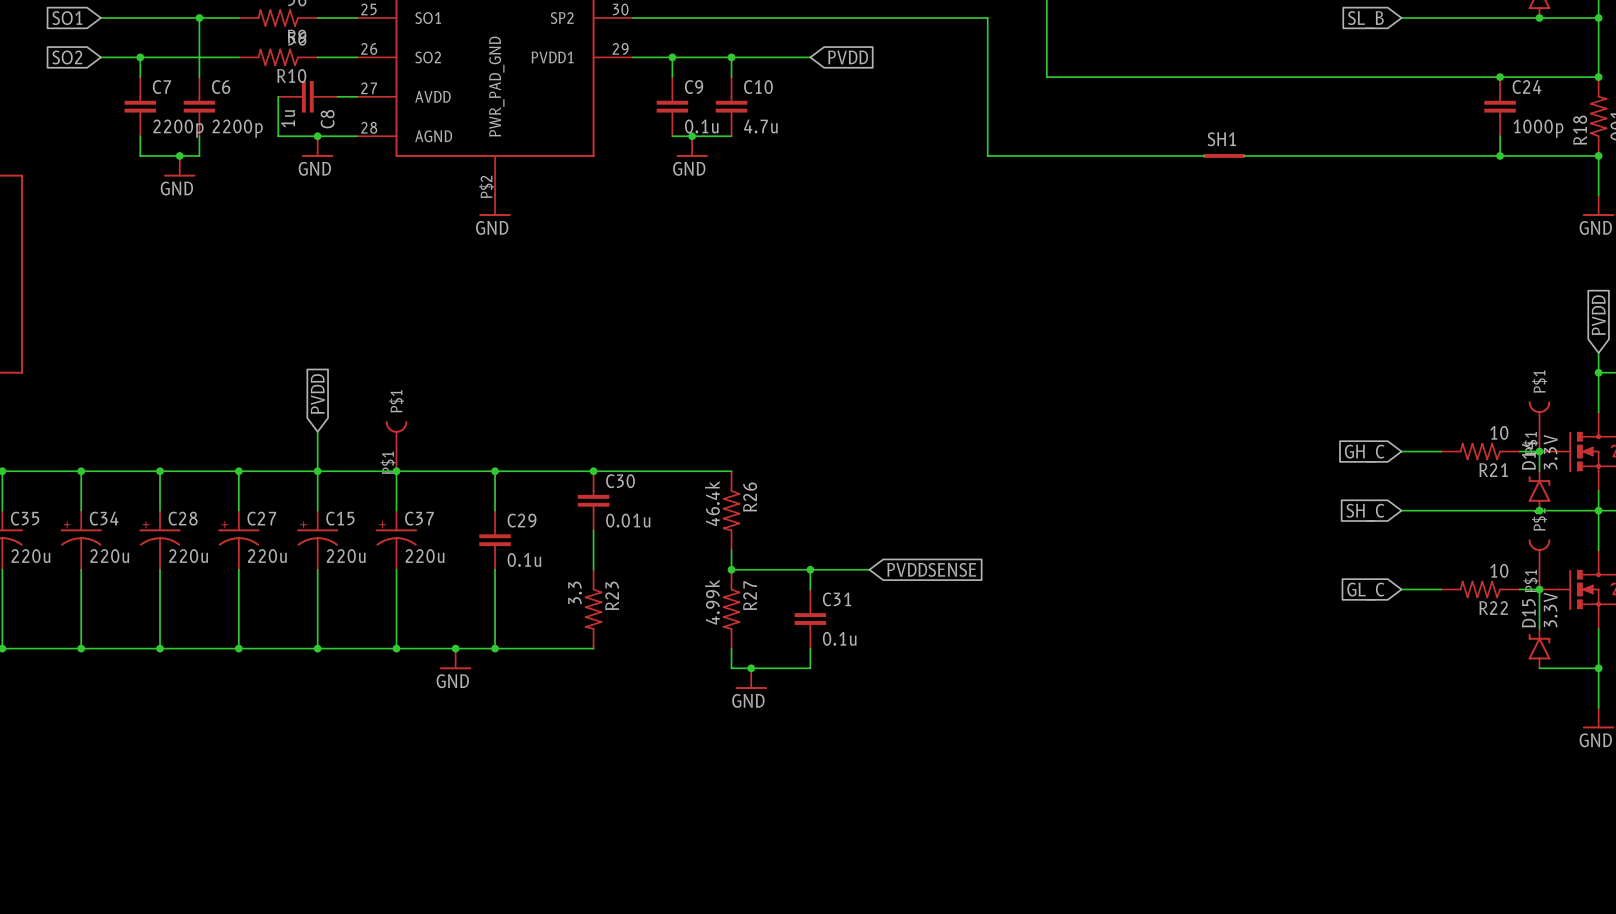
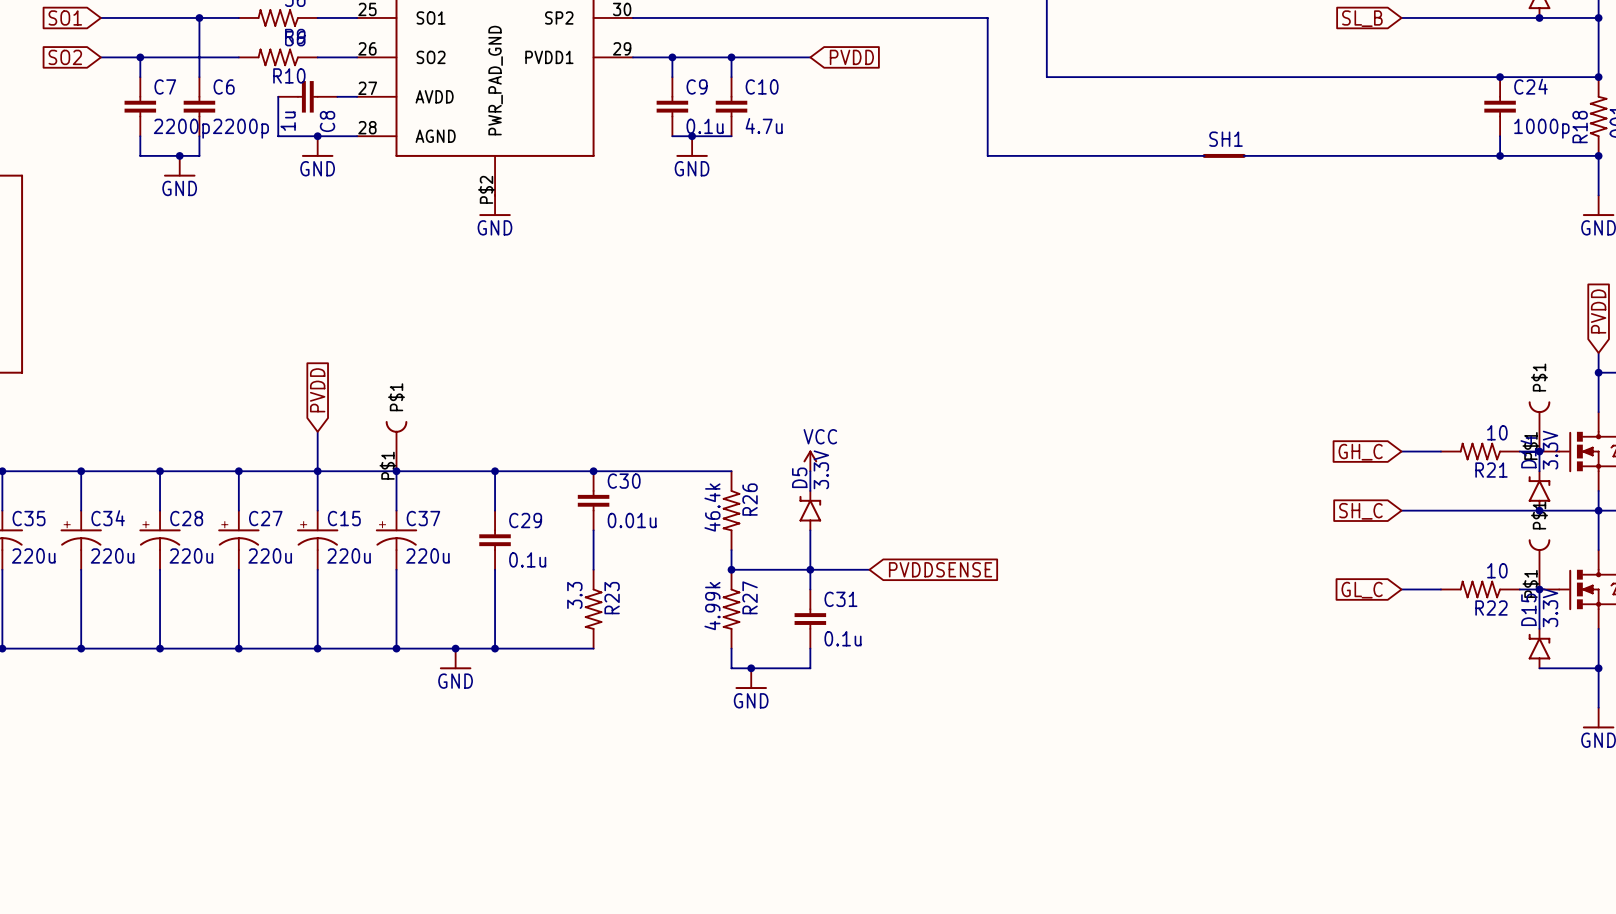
power symbol: none -> VCC (810, 460)
wire: none -> (810, 471) (810, 490)
D5: none -> 3.3V (810, 510)
wire: none -> (810, 530) (810, 569)

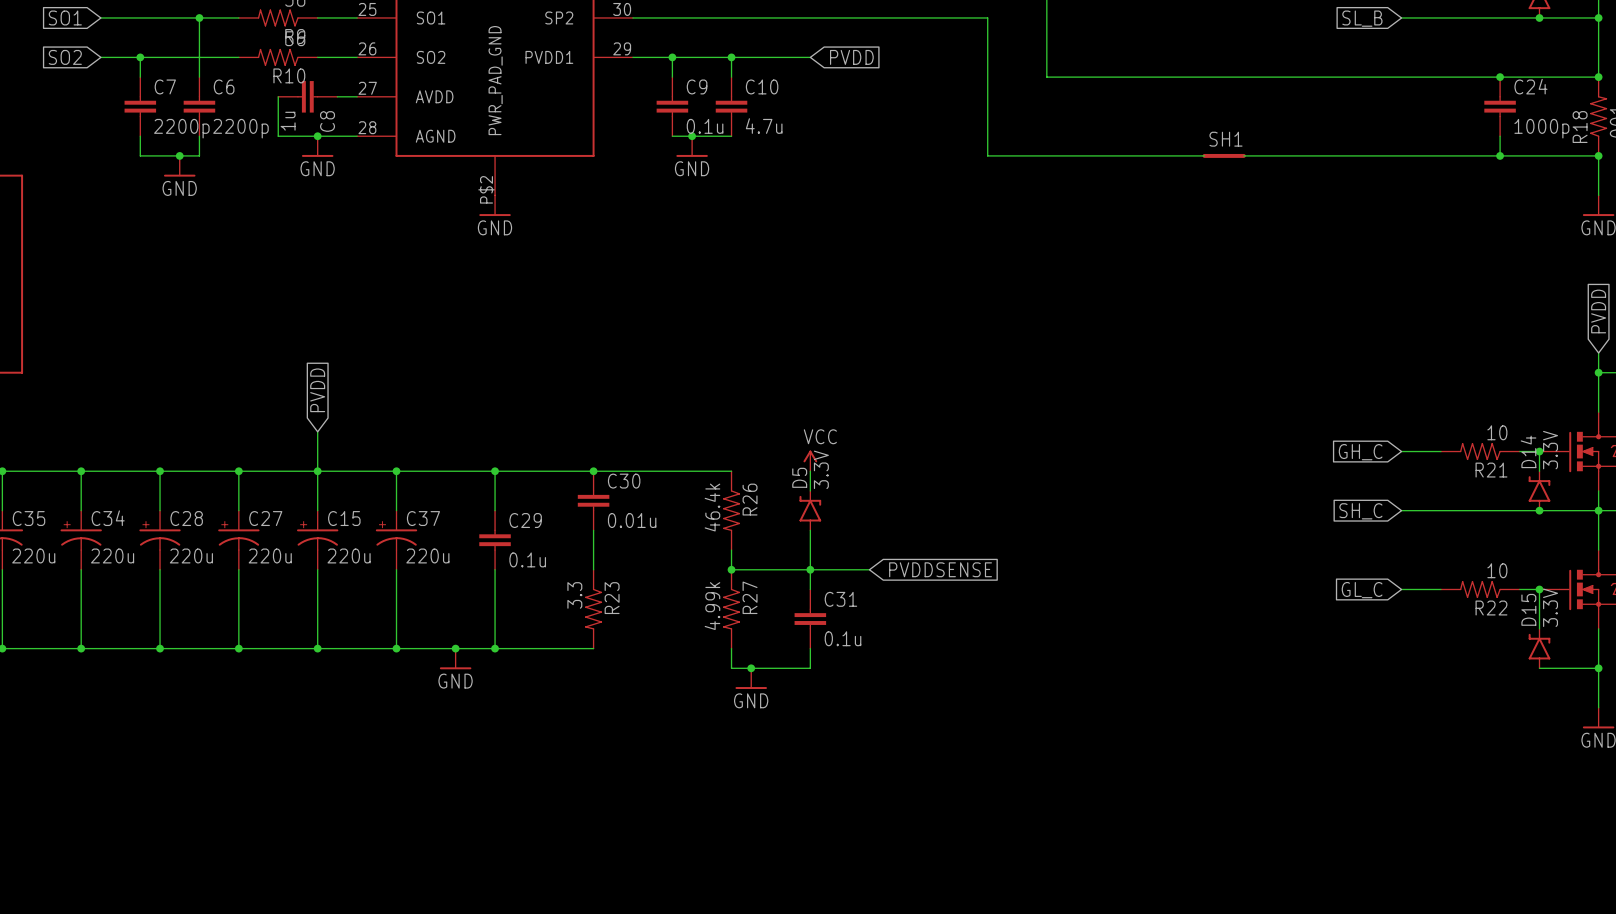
part: (1539, 426) -> none
part: (396, 446) -> none
part: (1539, 564) -> none

